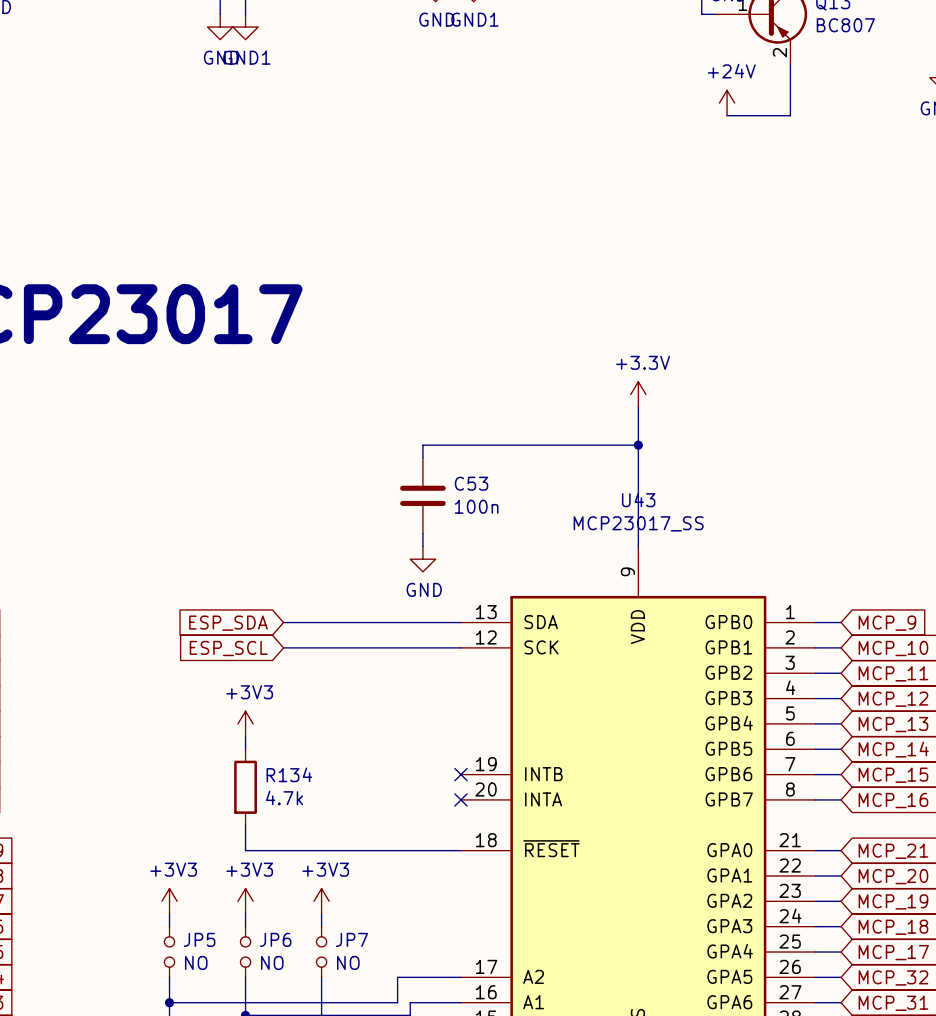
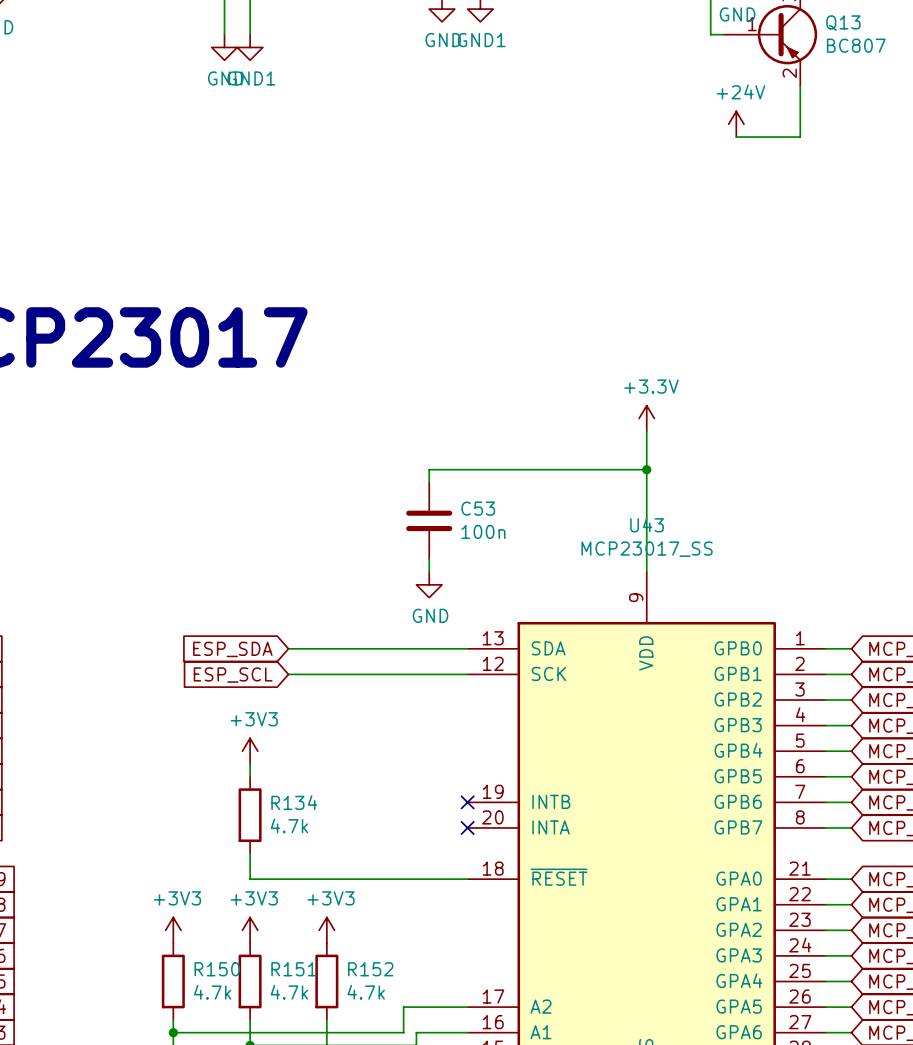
JP5: NO (169, 952) -> none
R150: none -> 4.7k (173, 981)
JP6: NO (245, 952) -> none
R151: none -> 4.7k (250, 981)
JP7: NO (321, 952) -> none
R152: none -> 4.7k (326, 981)

